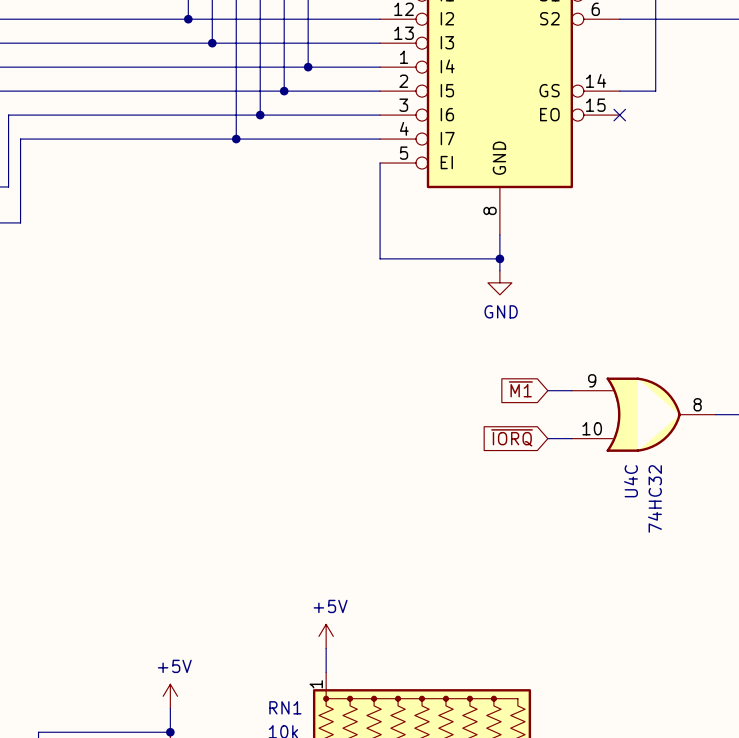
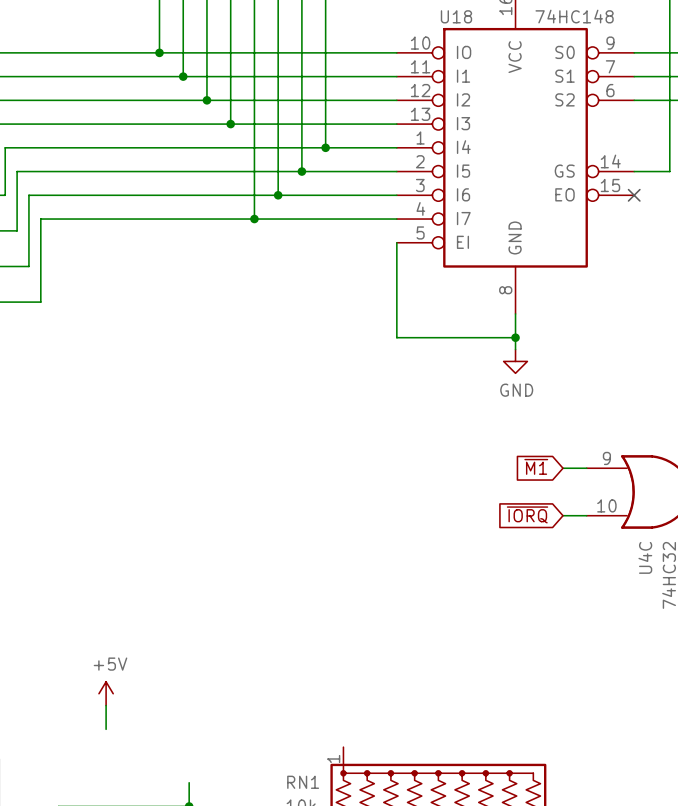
wire: none -> (106, 705) (106, 729)
power symbol: +5V (326, 636) -> none
wire: (326, 648) (326, 672) -> none
power symbol position: +5V (170, 696) -> +5V (106, 693)

